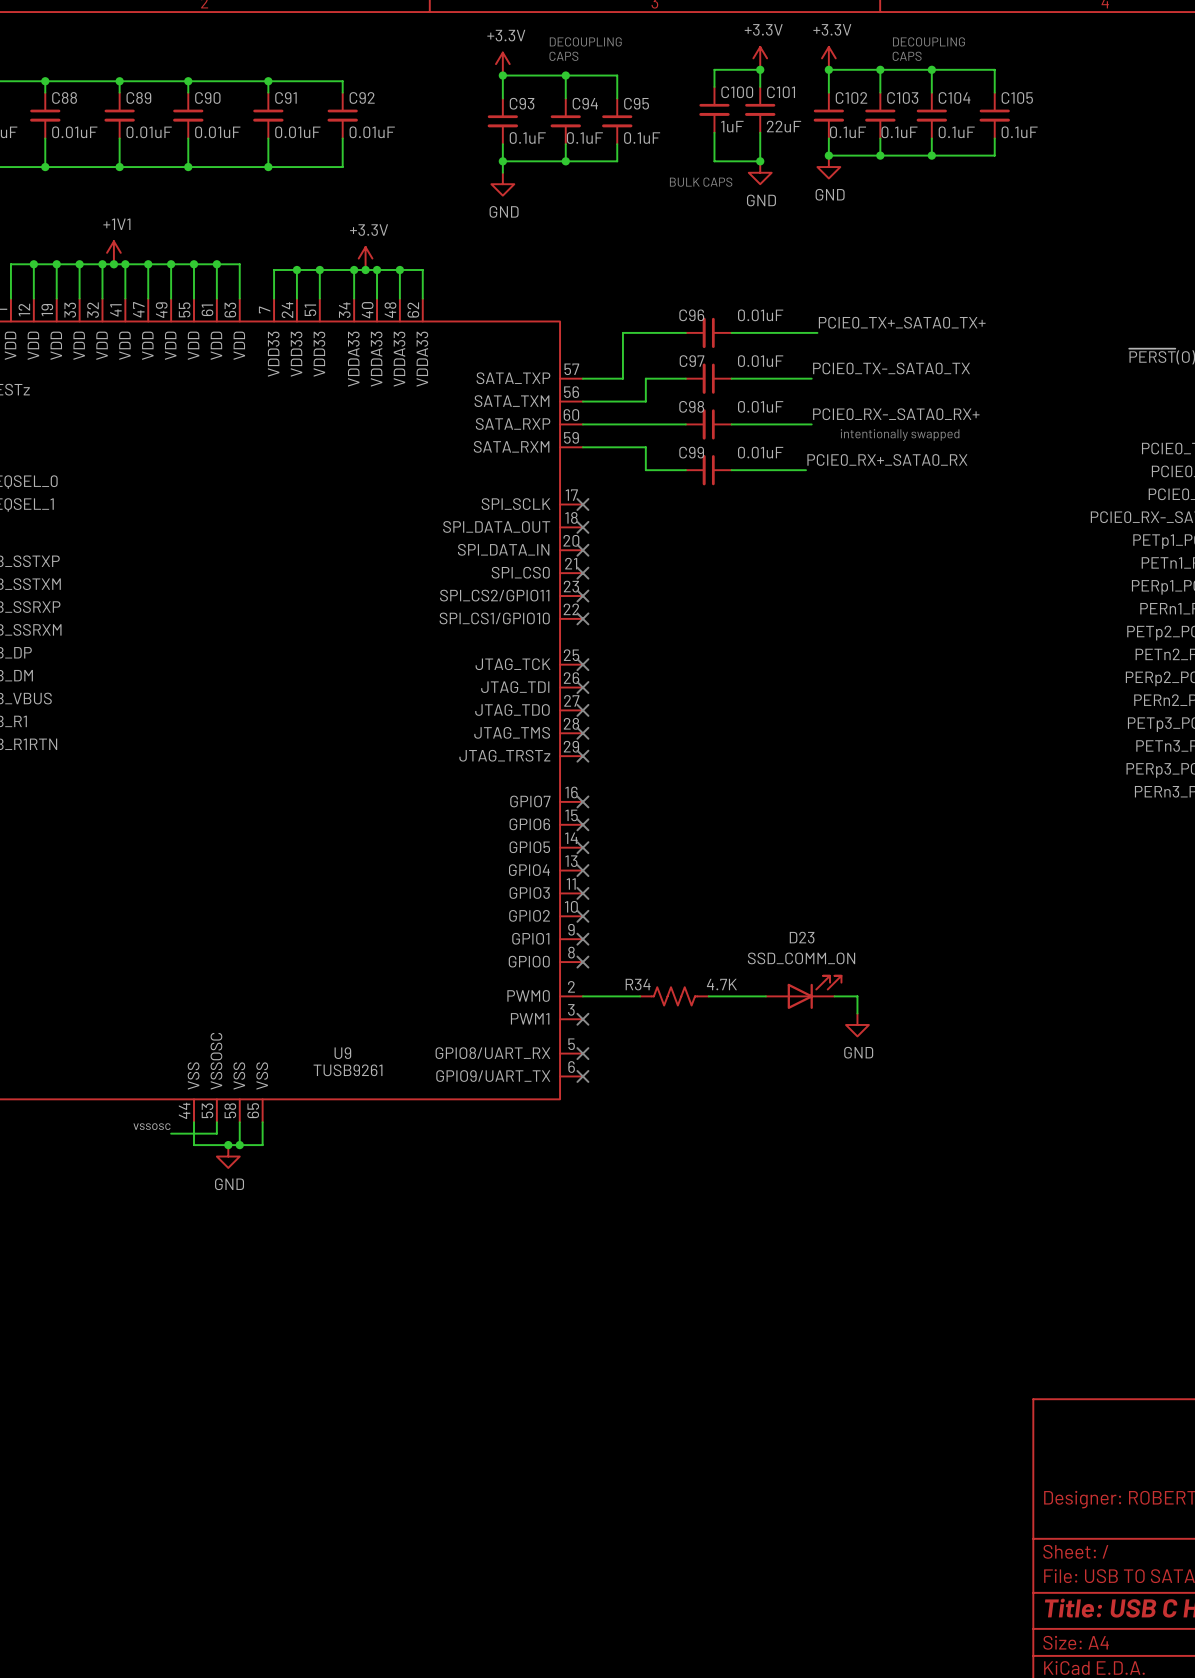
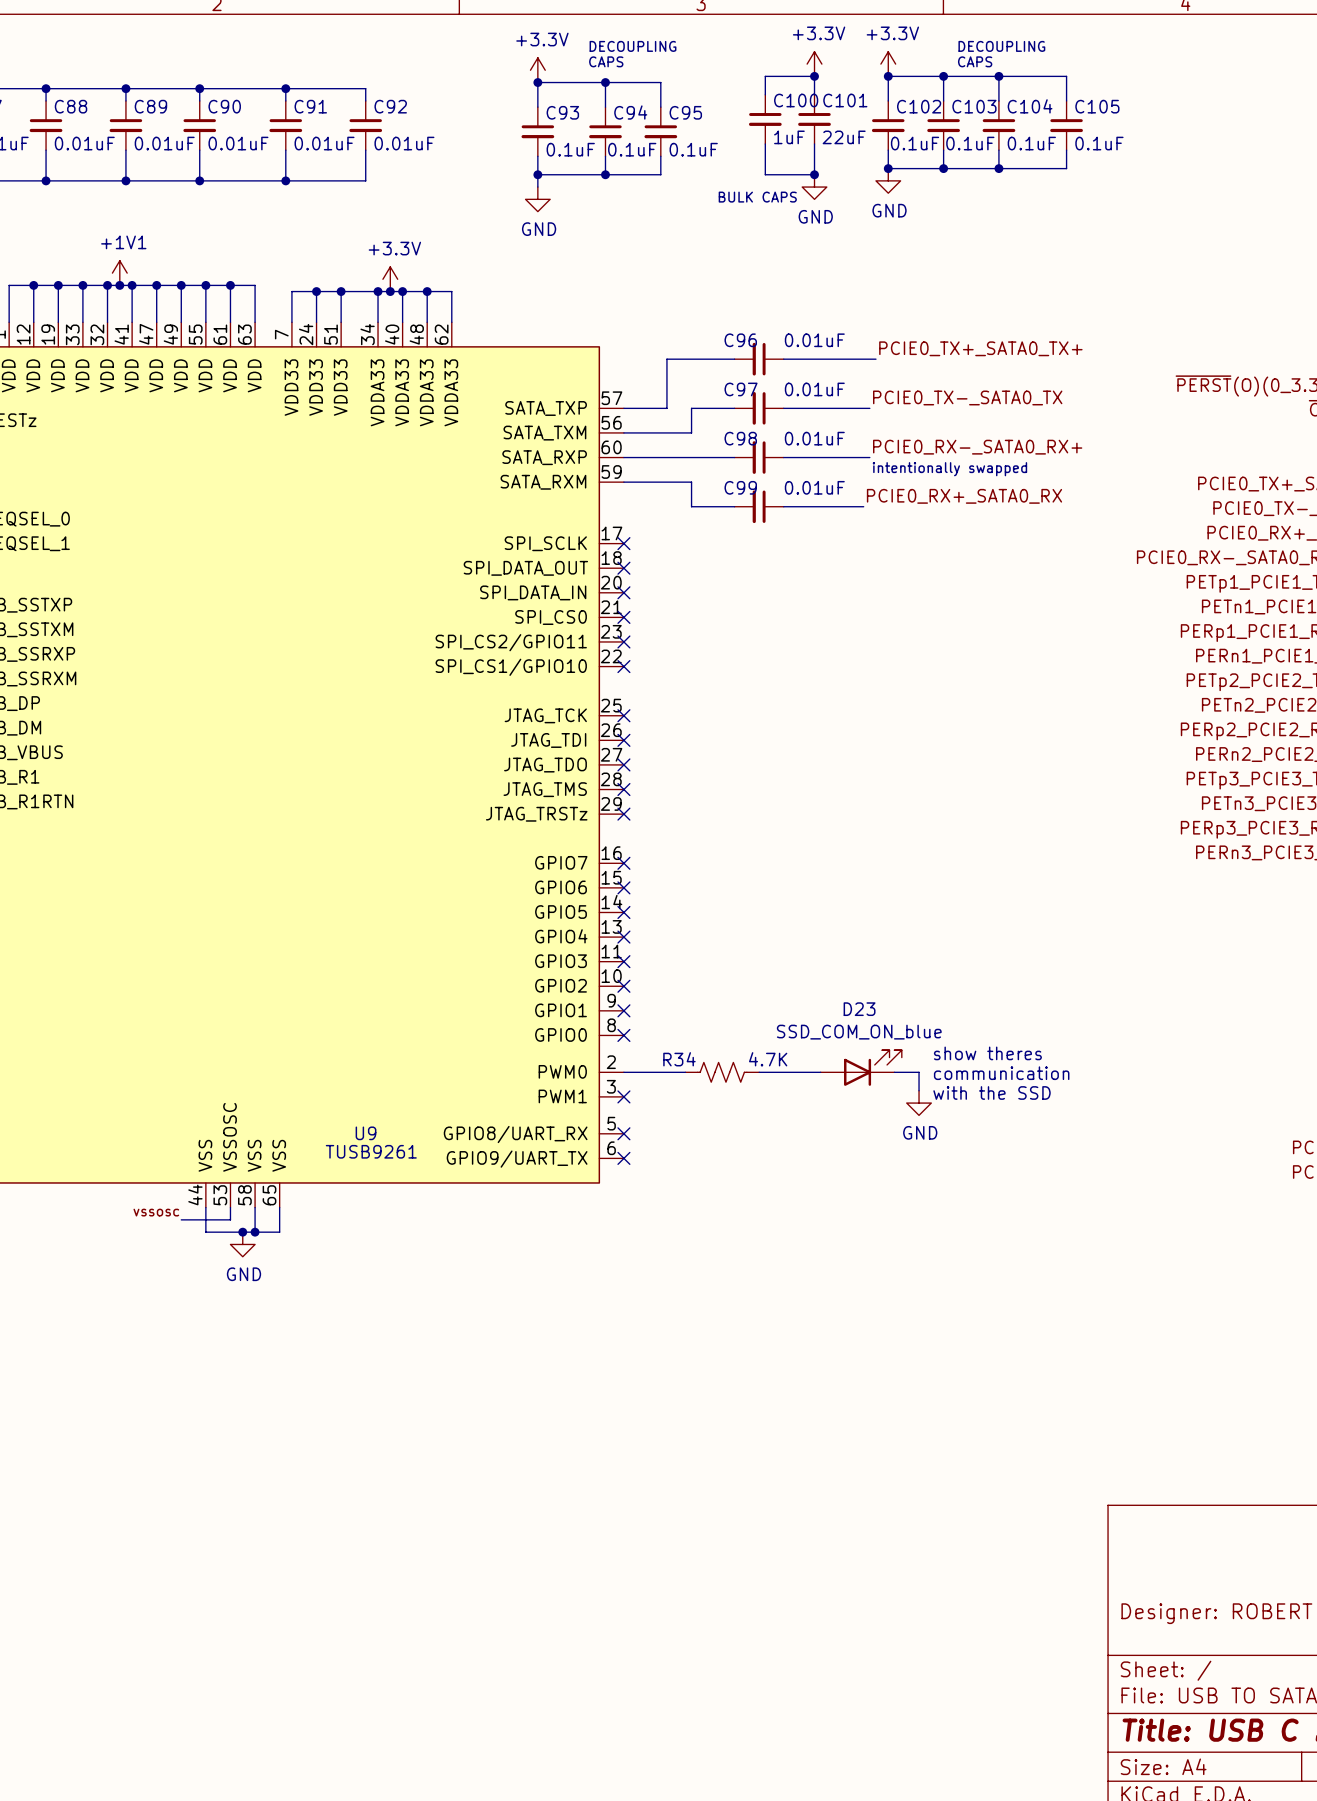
D23 value: SSD_COMM_ON (801, 958) -> SSD_COM_ON_blue (859, 1032)
text: none -> show theres (987, 1053)
text: none -> communication (1001, 1073)
text: none -> with the SSD (992, 1092)

